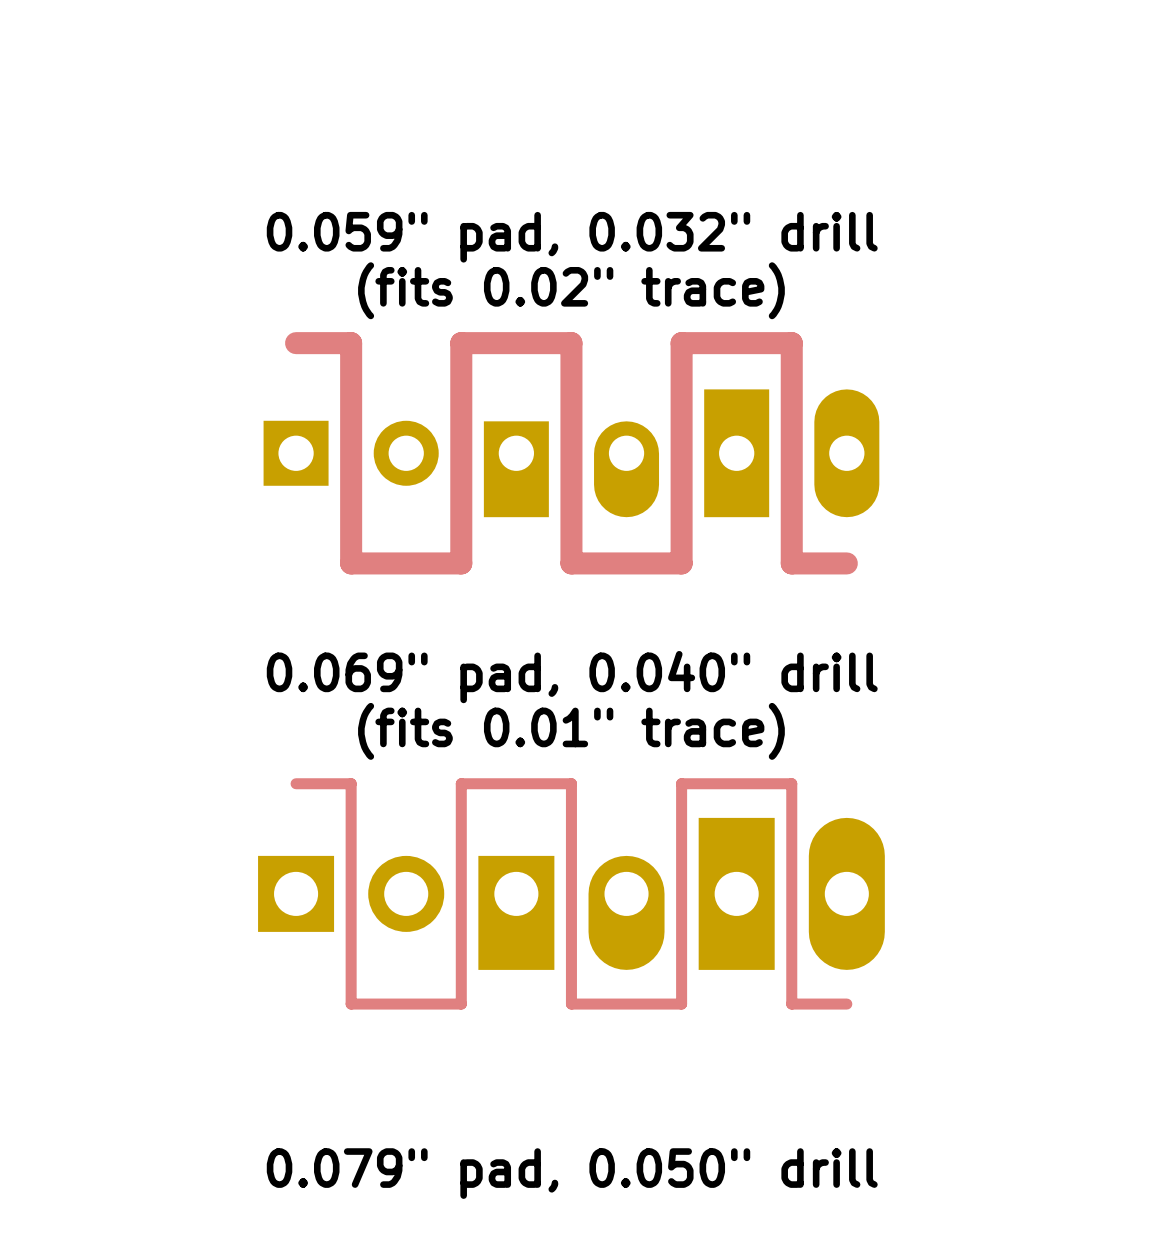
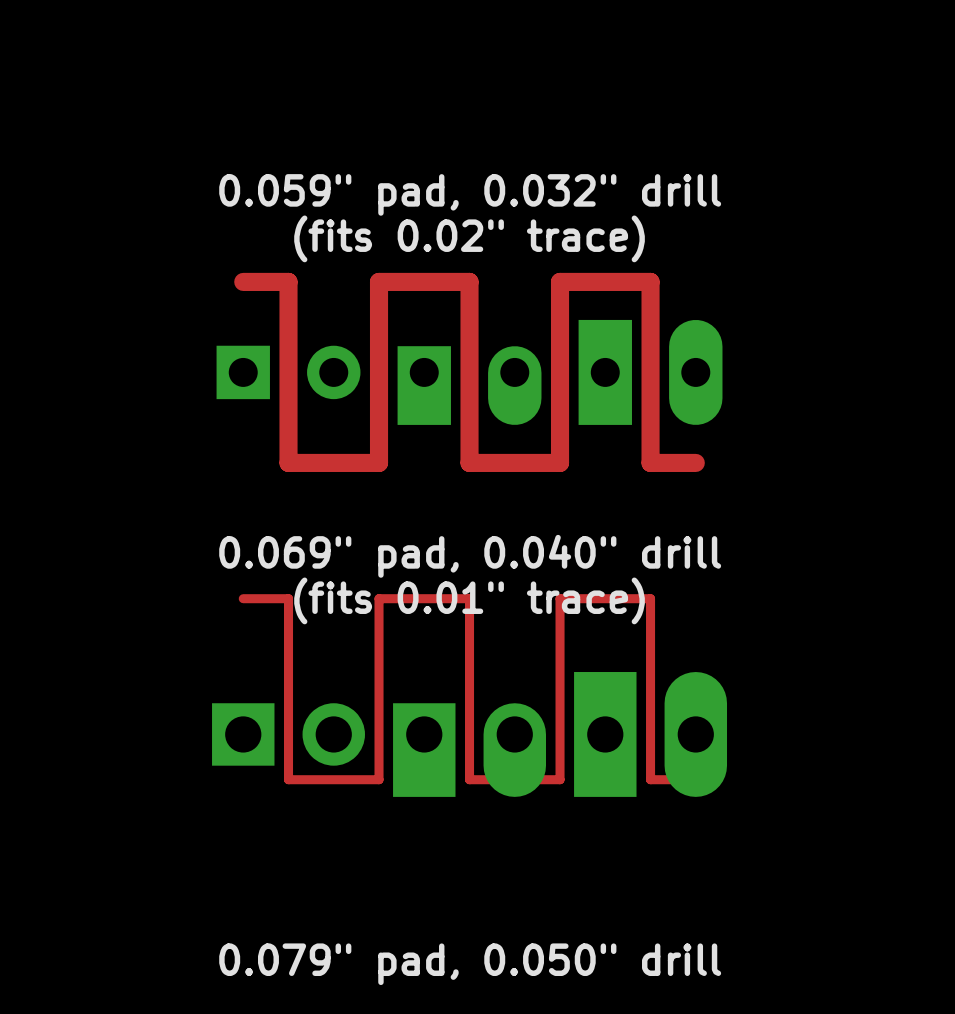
top track: (296, 783) (351, 783) -> (243, 598) (288, 598) (288, 643)
top track: (461, 783) (571, 783) -> (379, 643) (379, 598) (469, 598) (469, 643)
top track: (681, 783) (791, 783) -> (560, 643) (560, 598) (650, 598) (650, 643)
top track: (351, 948) (351, 1004) (461, 1004) (461, 948) -> (288, 779) (379, 779)
top track: (571, 948) (571, 1004) (681, 1004) (681, 948) -> (469, 779) (560, 779)
top track: (791, 948) (791, 1004) (846, 1004) -> (650, 779) (695, 779)

